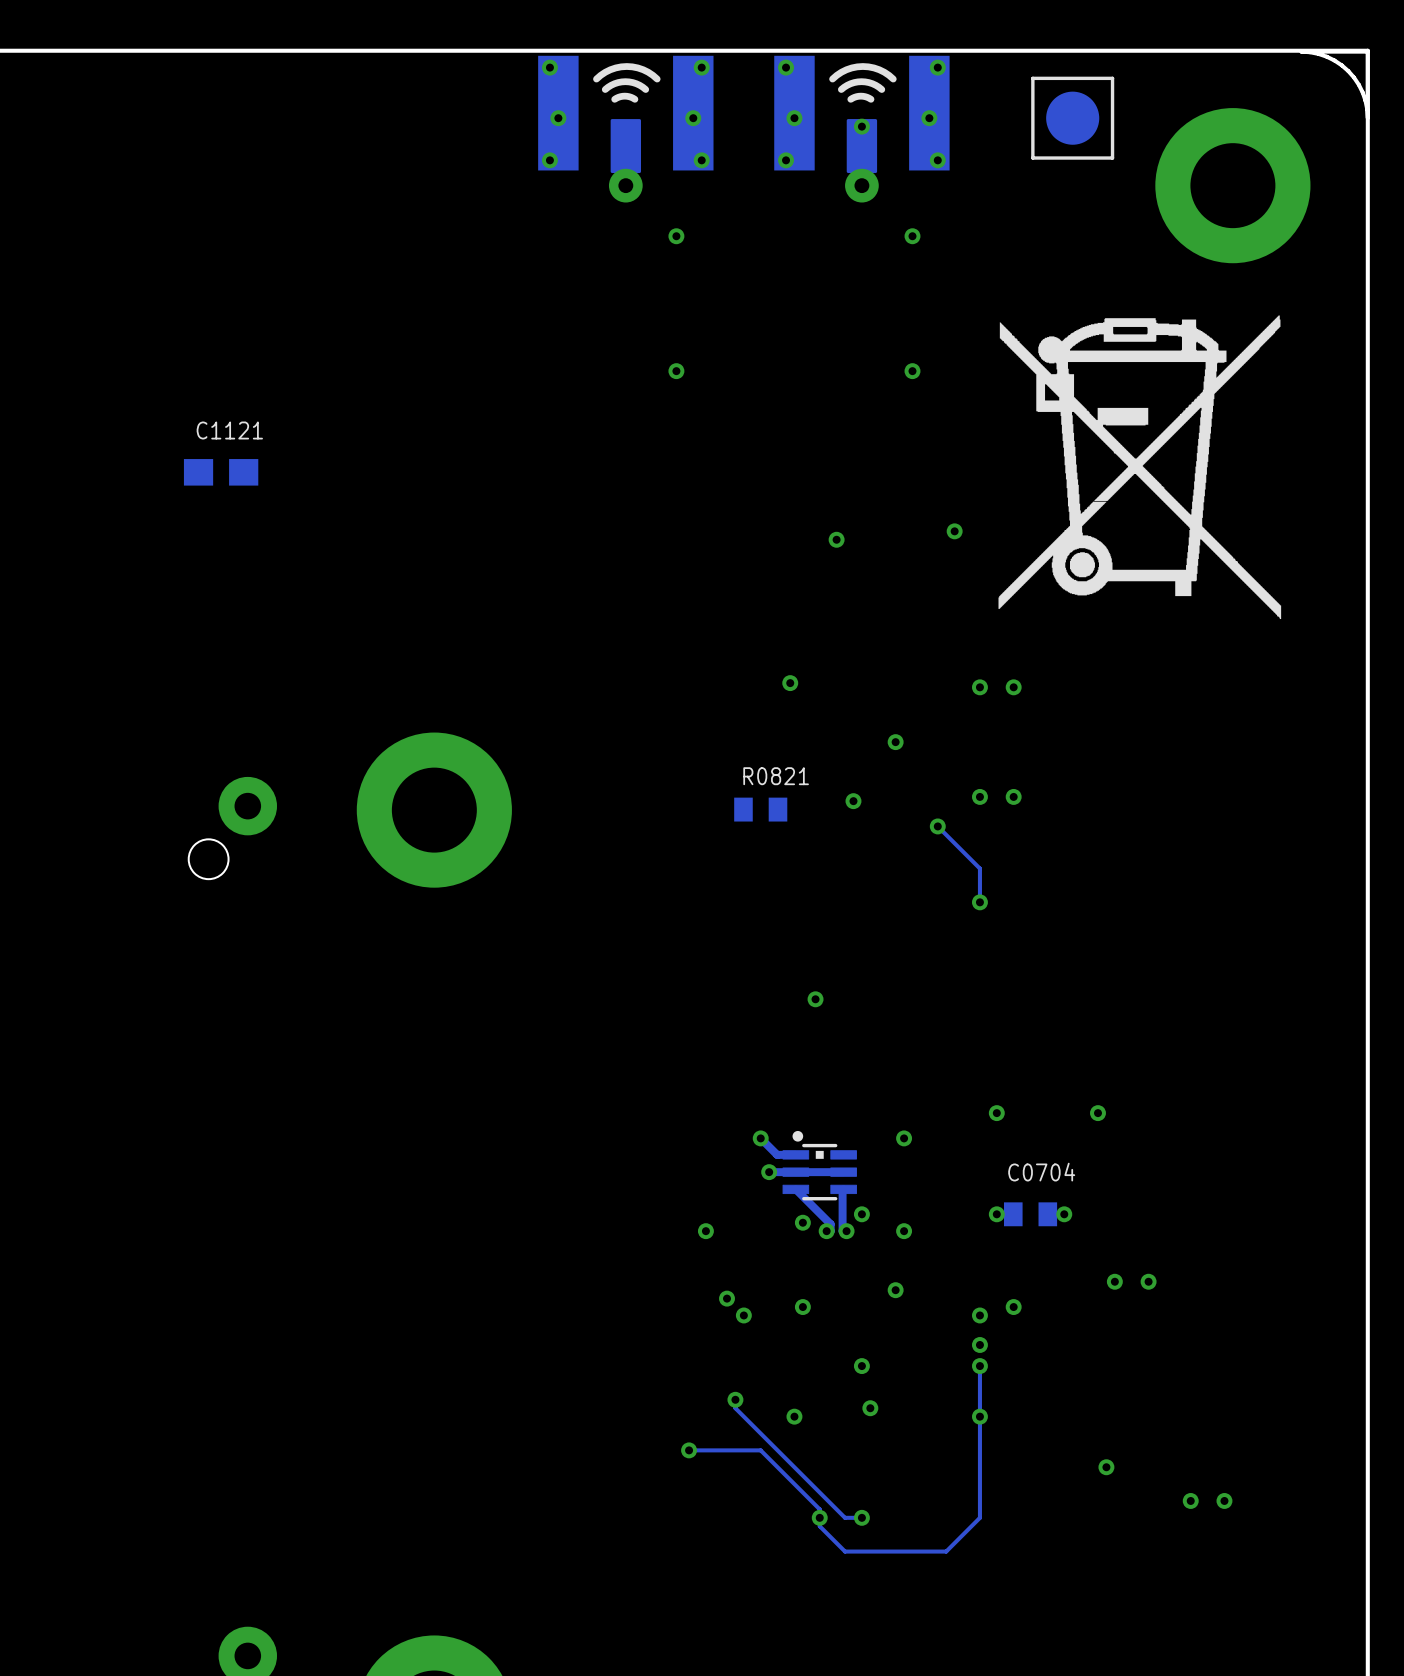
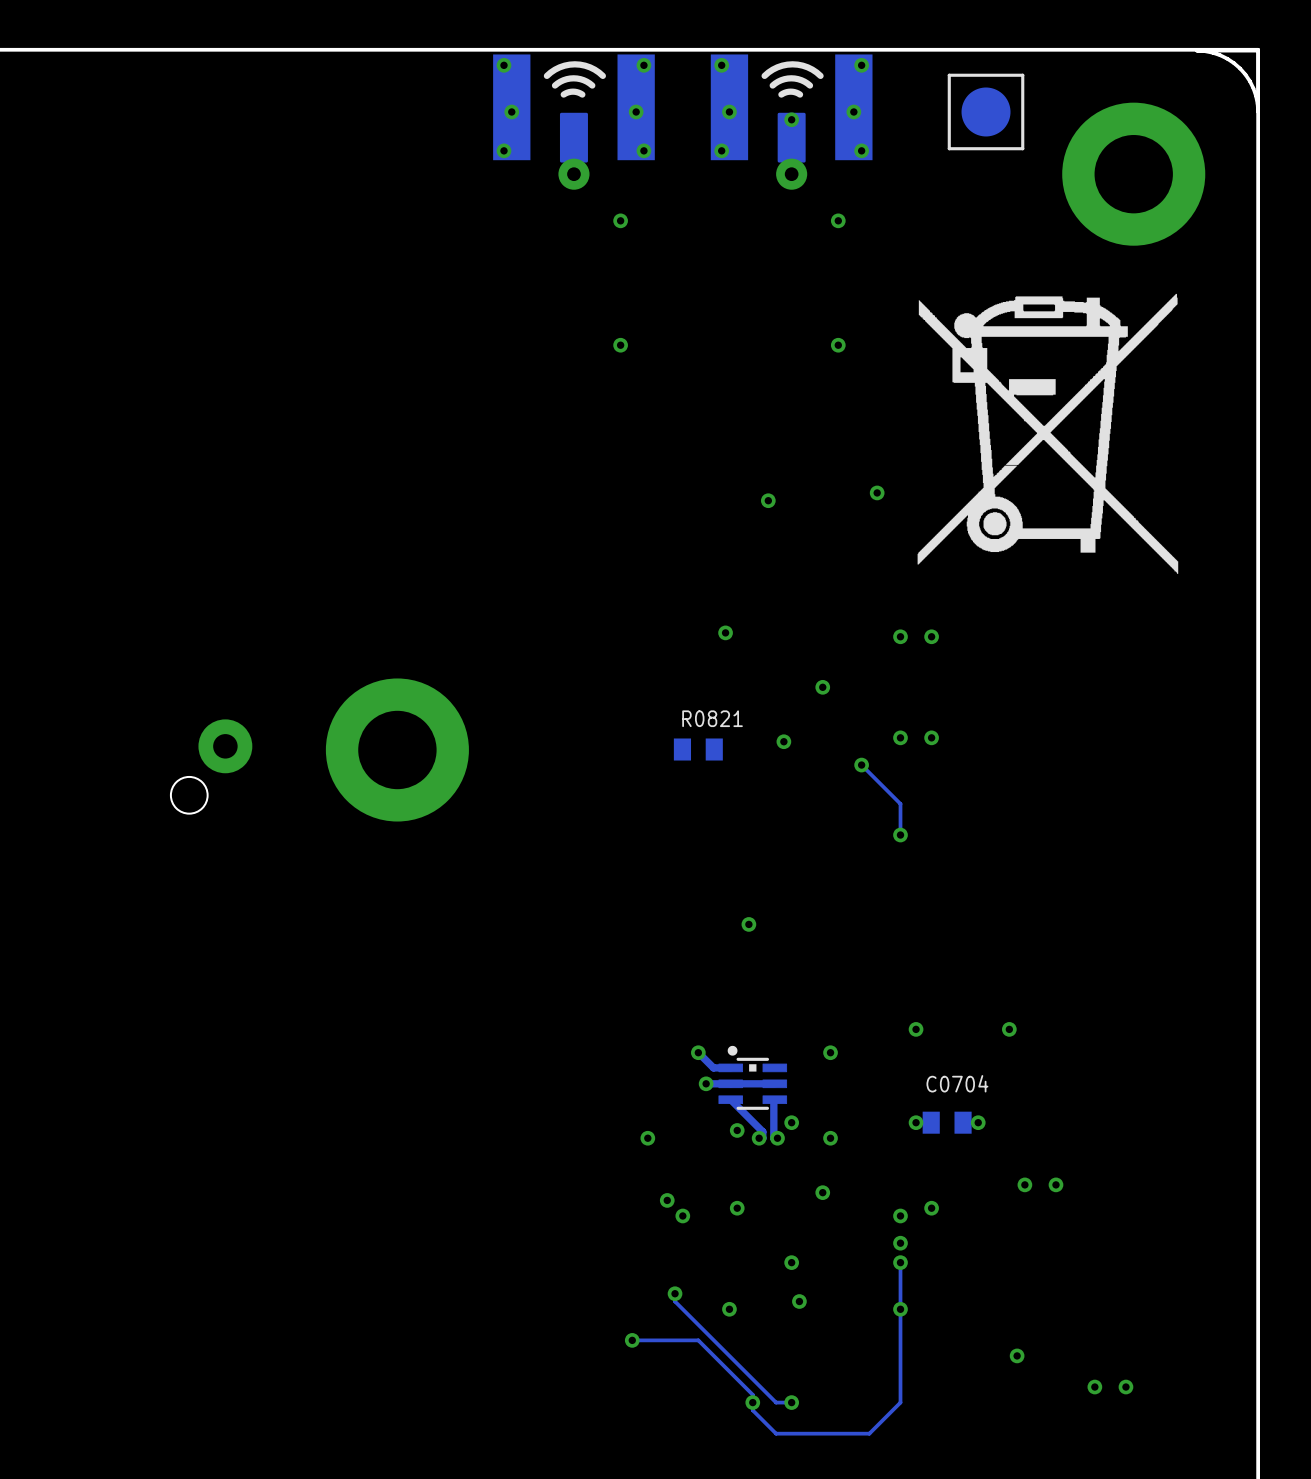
C1121: (221, 472) -> none

